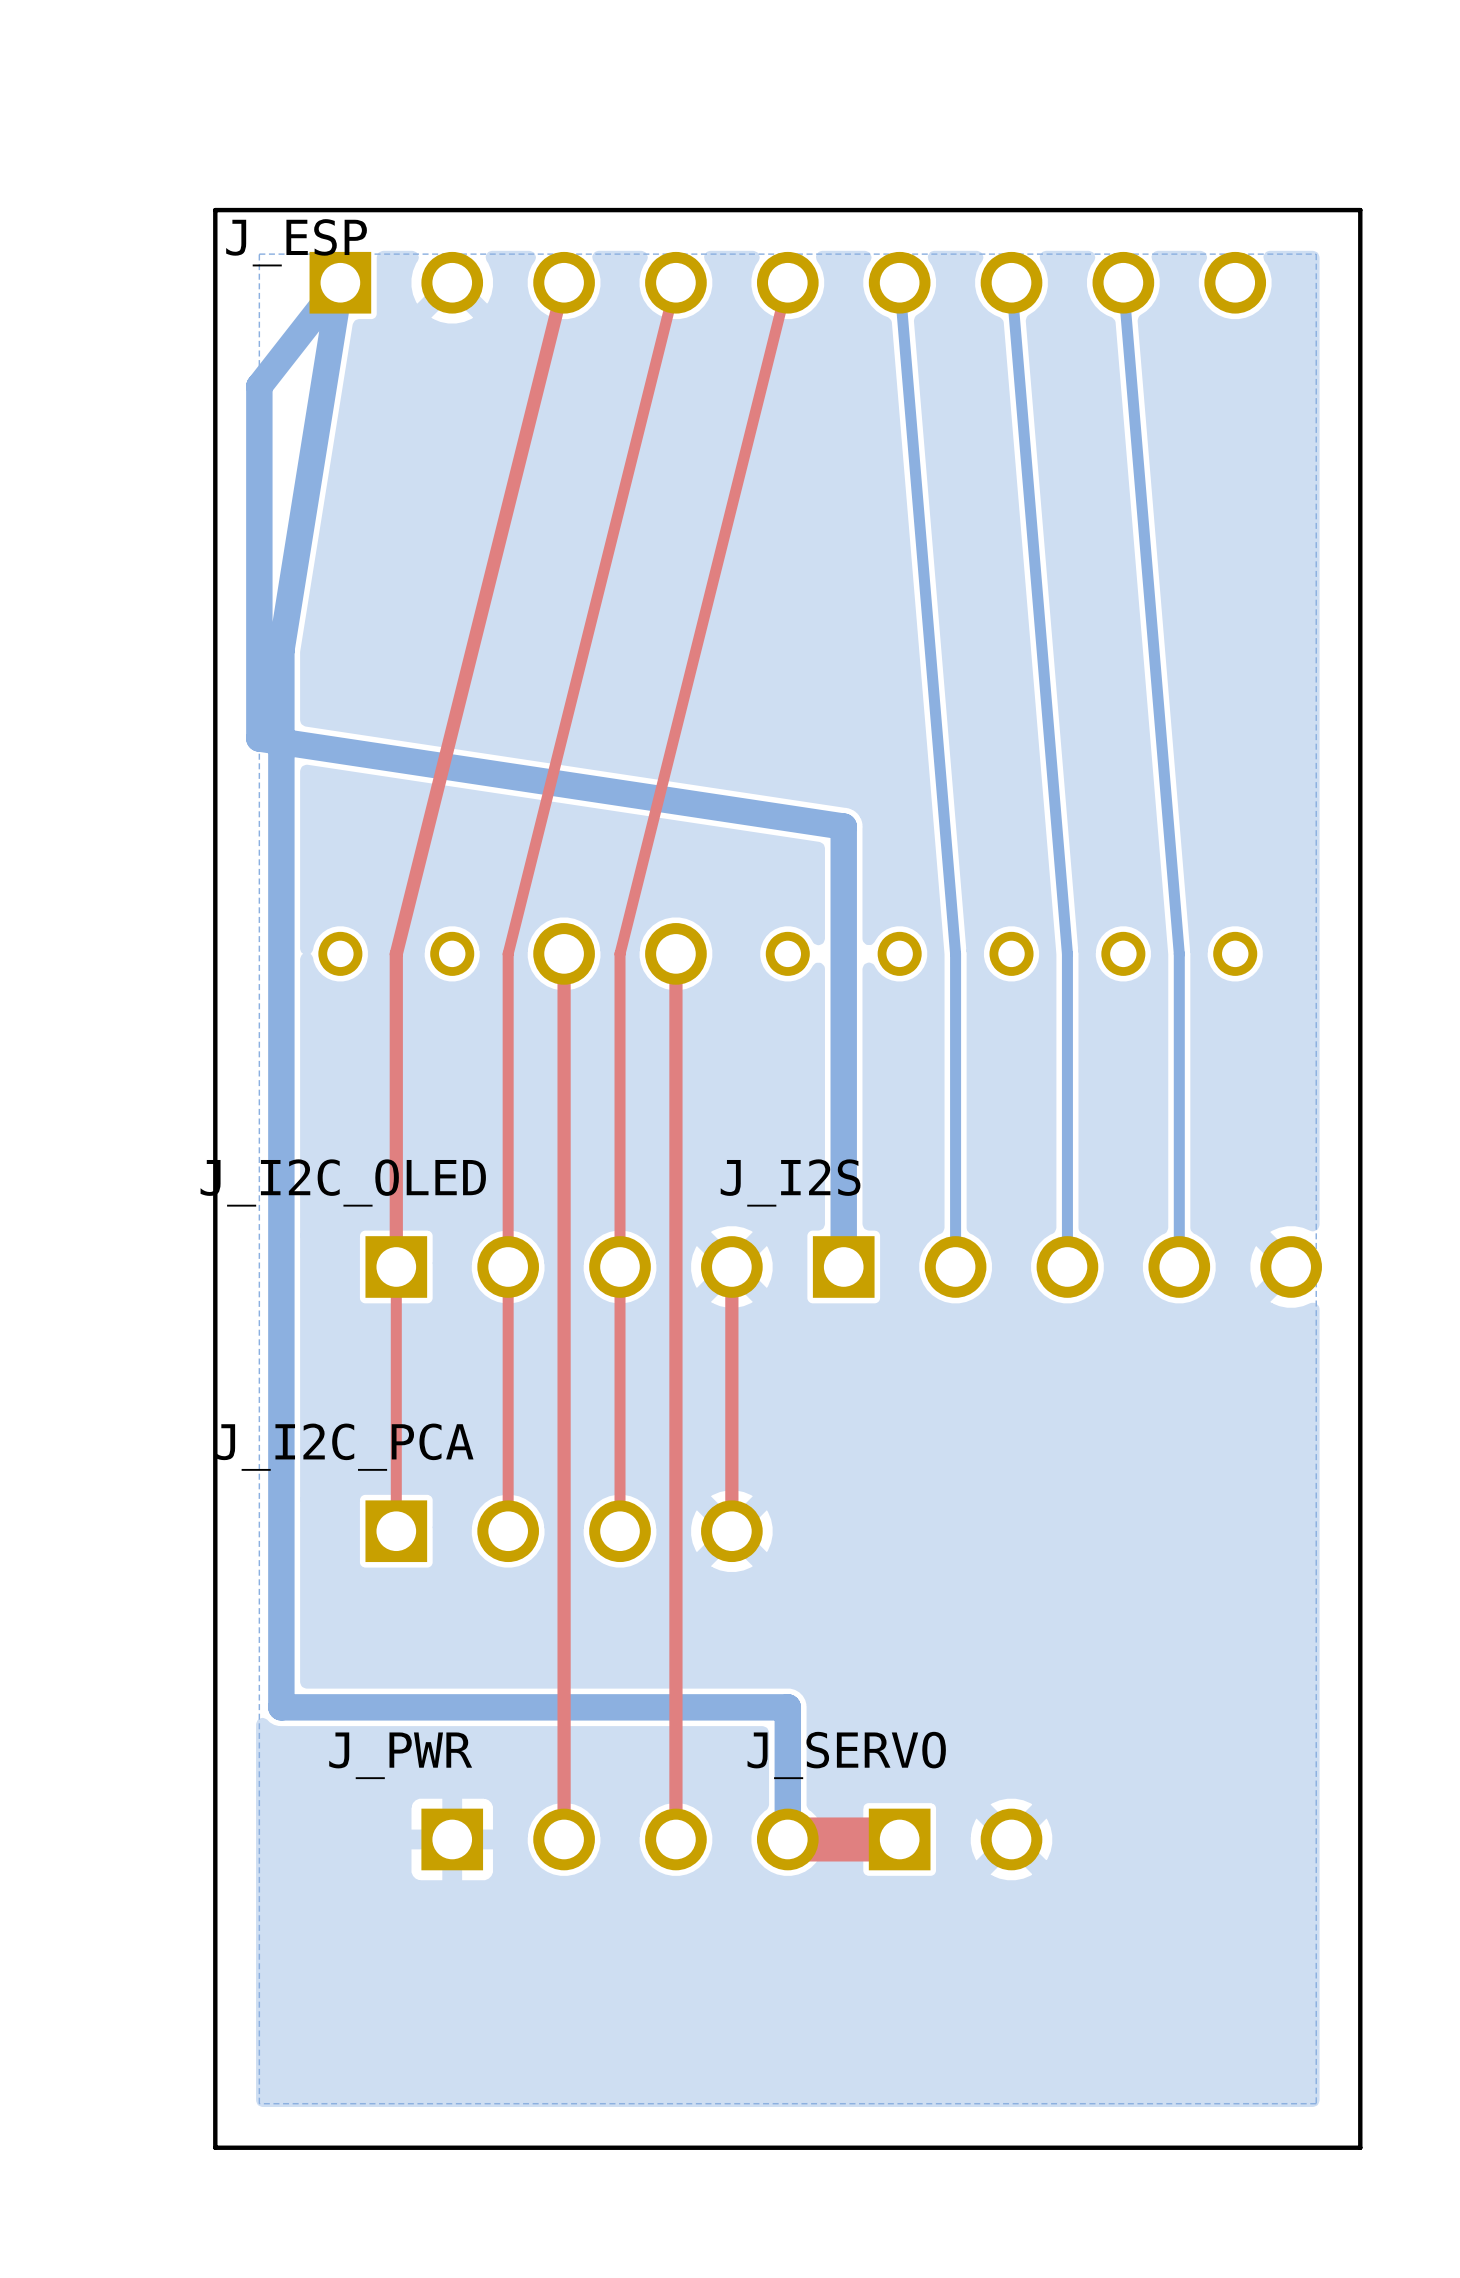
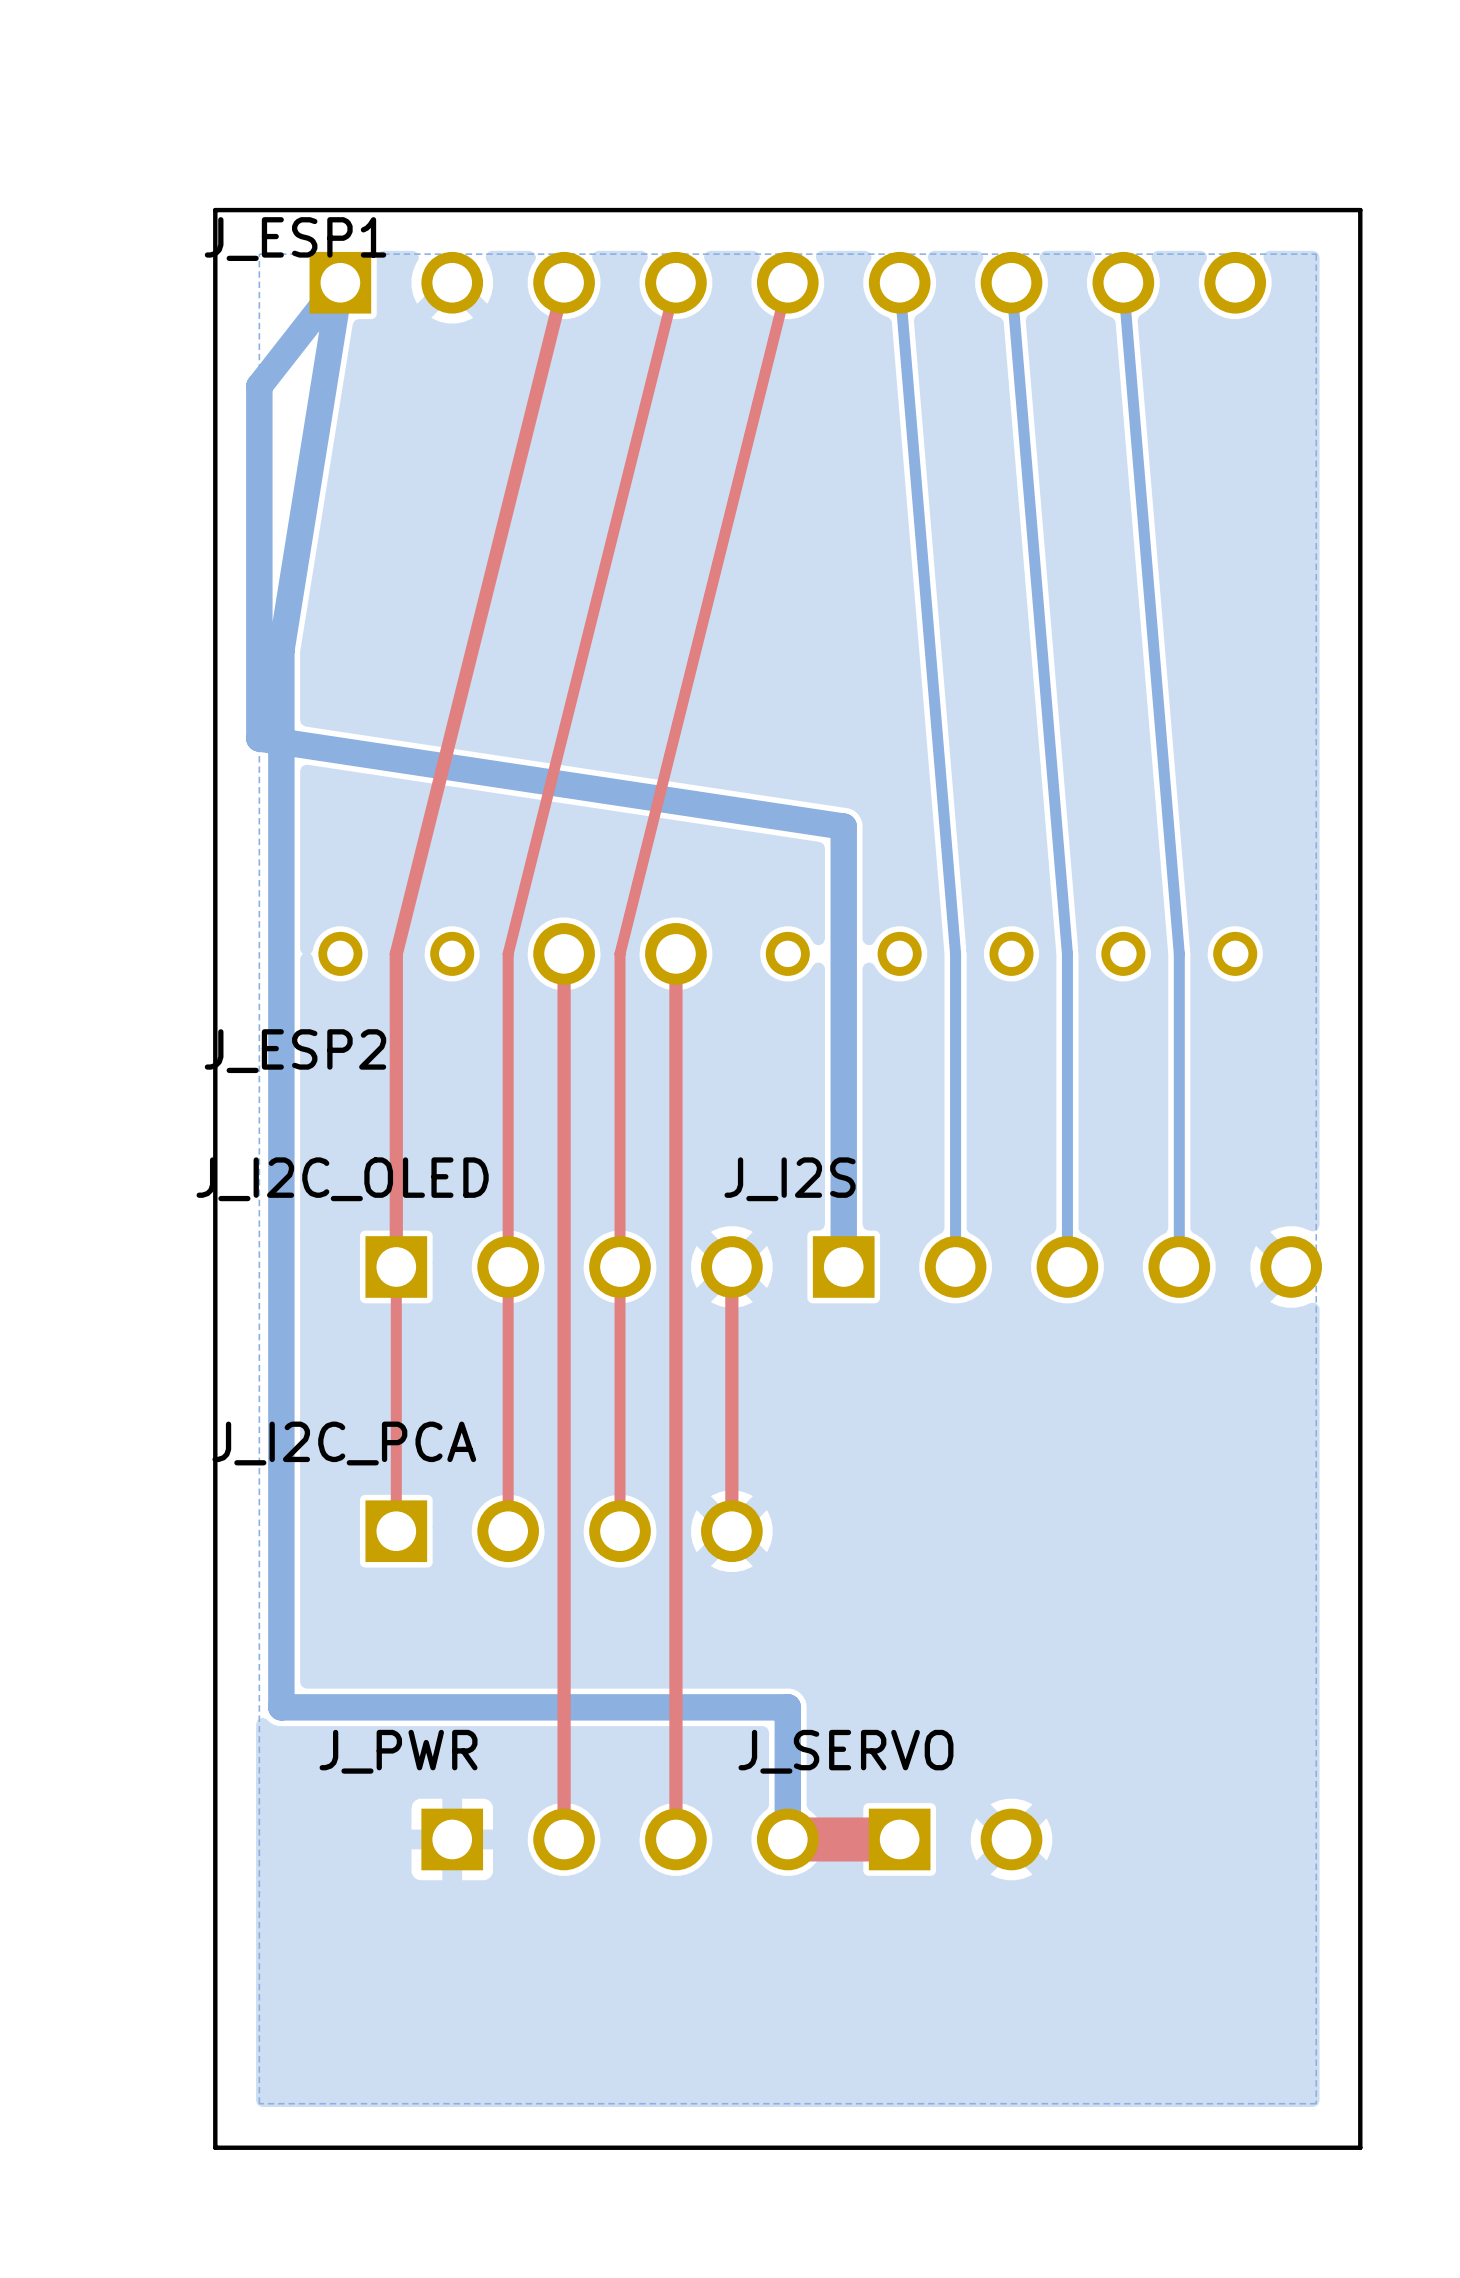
J_ESP1: none -> (787, 282)
J_ESP: (787, 618) -> none
J_ESP2: none -> (787, 953)

